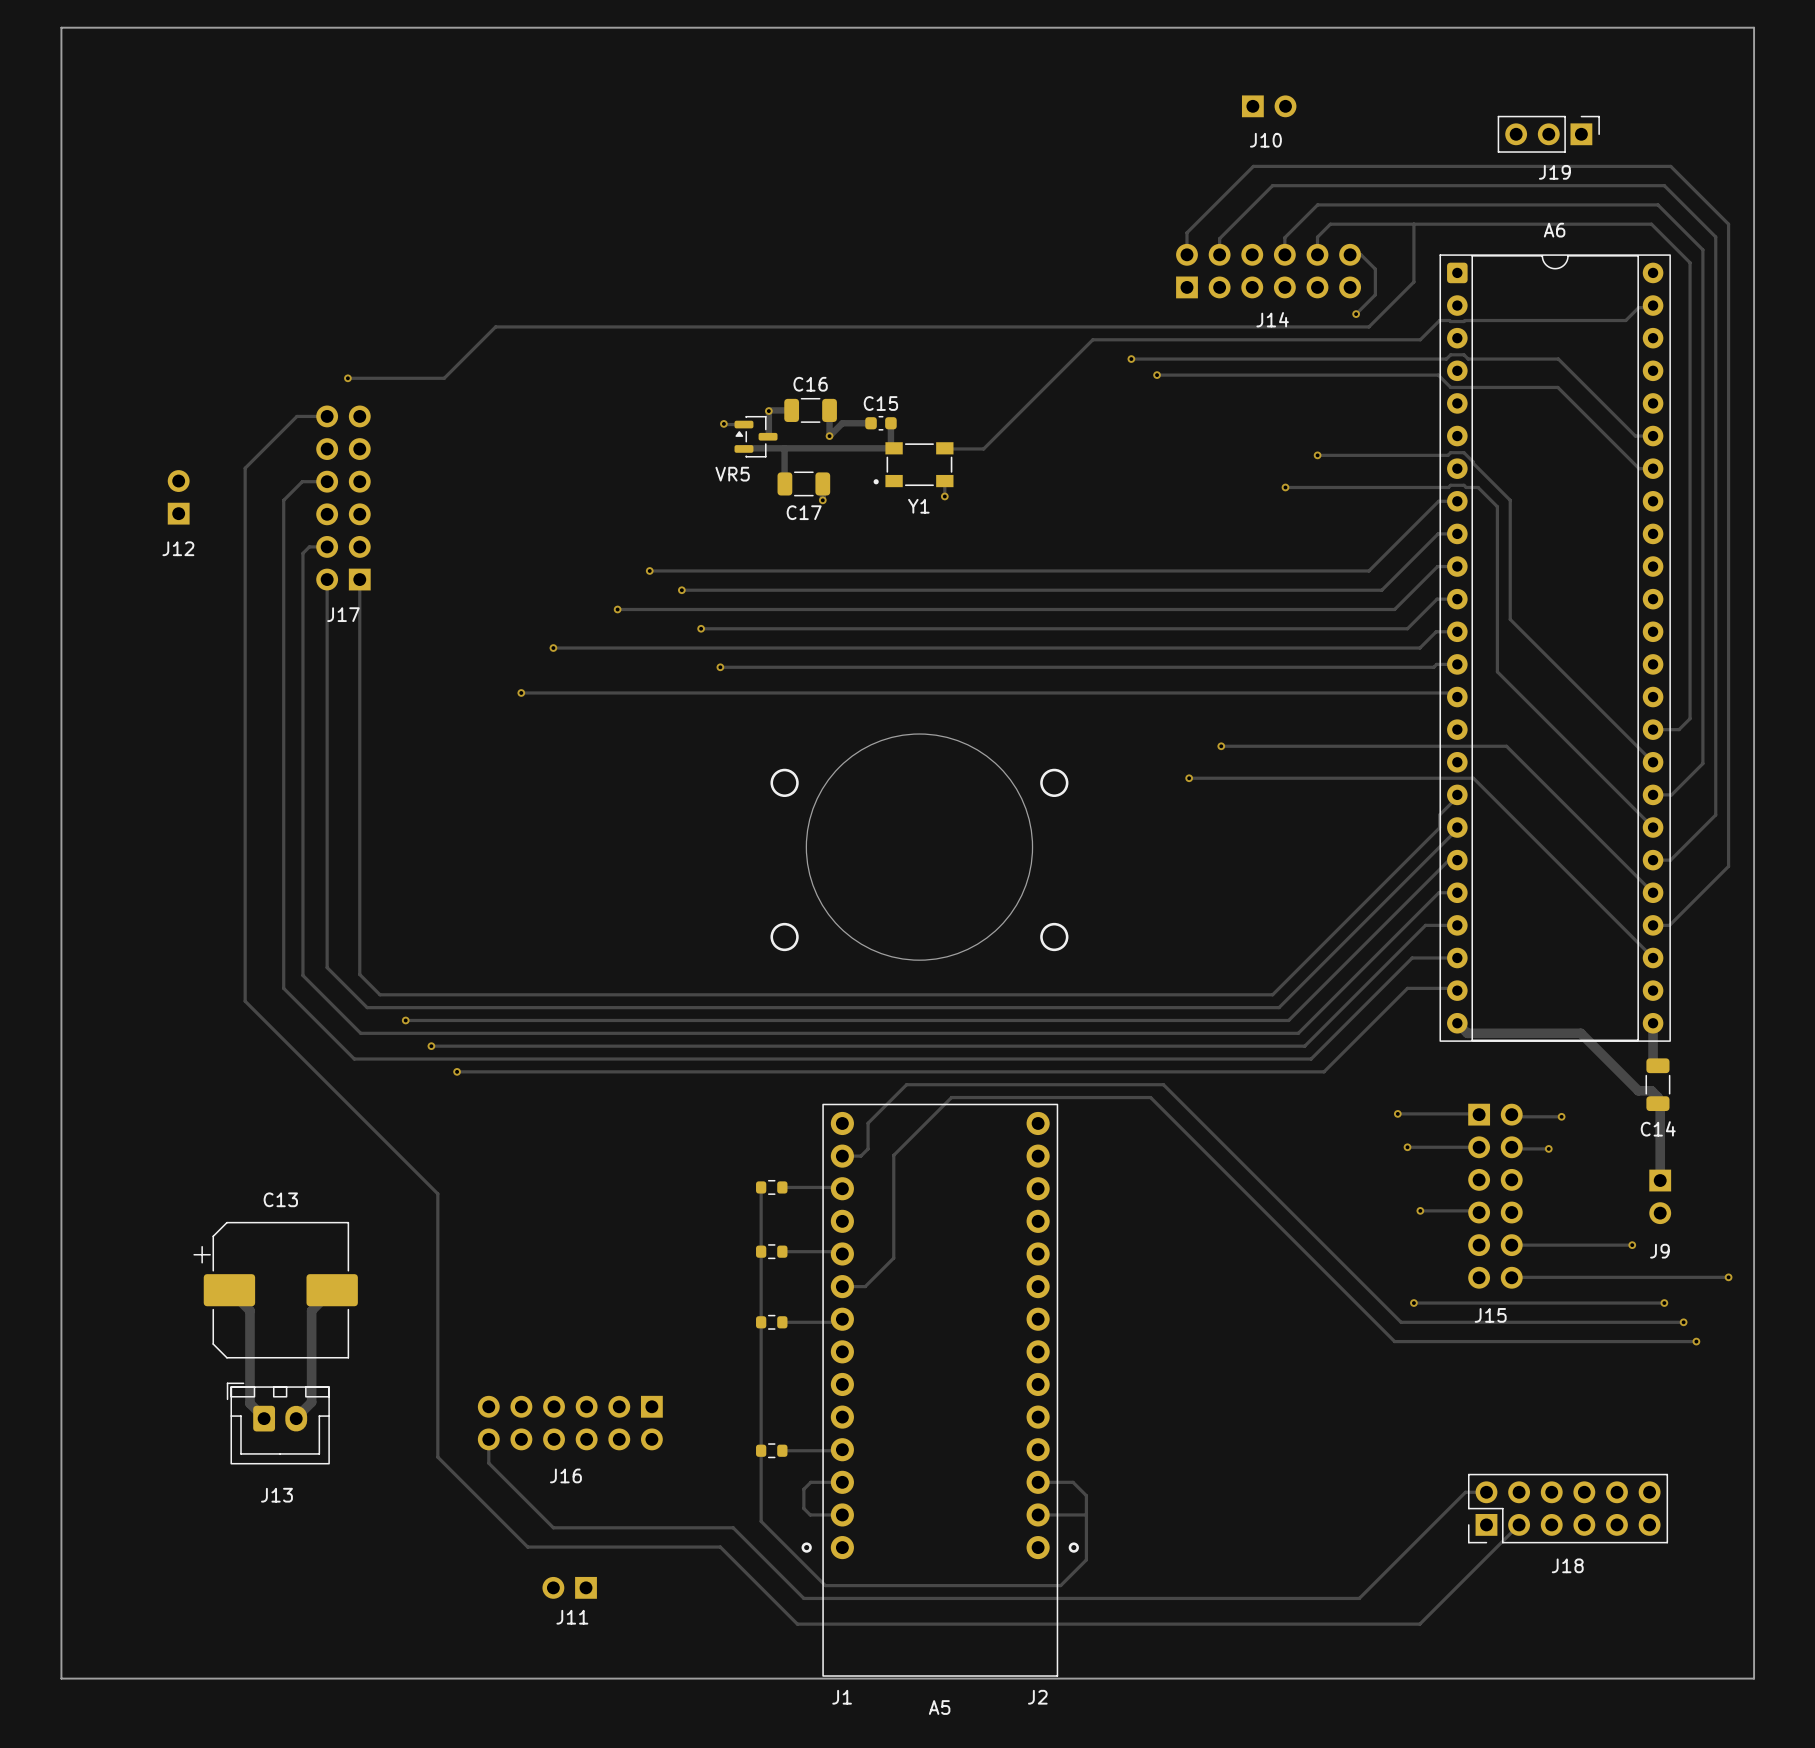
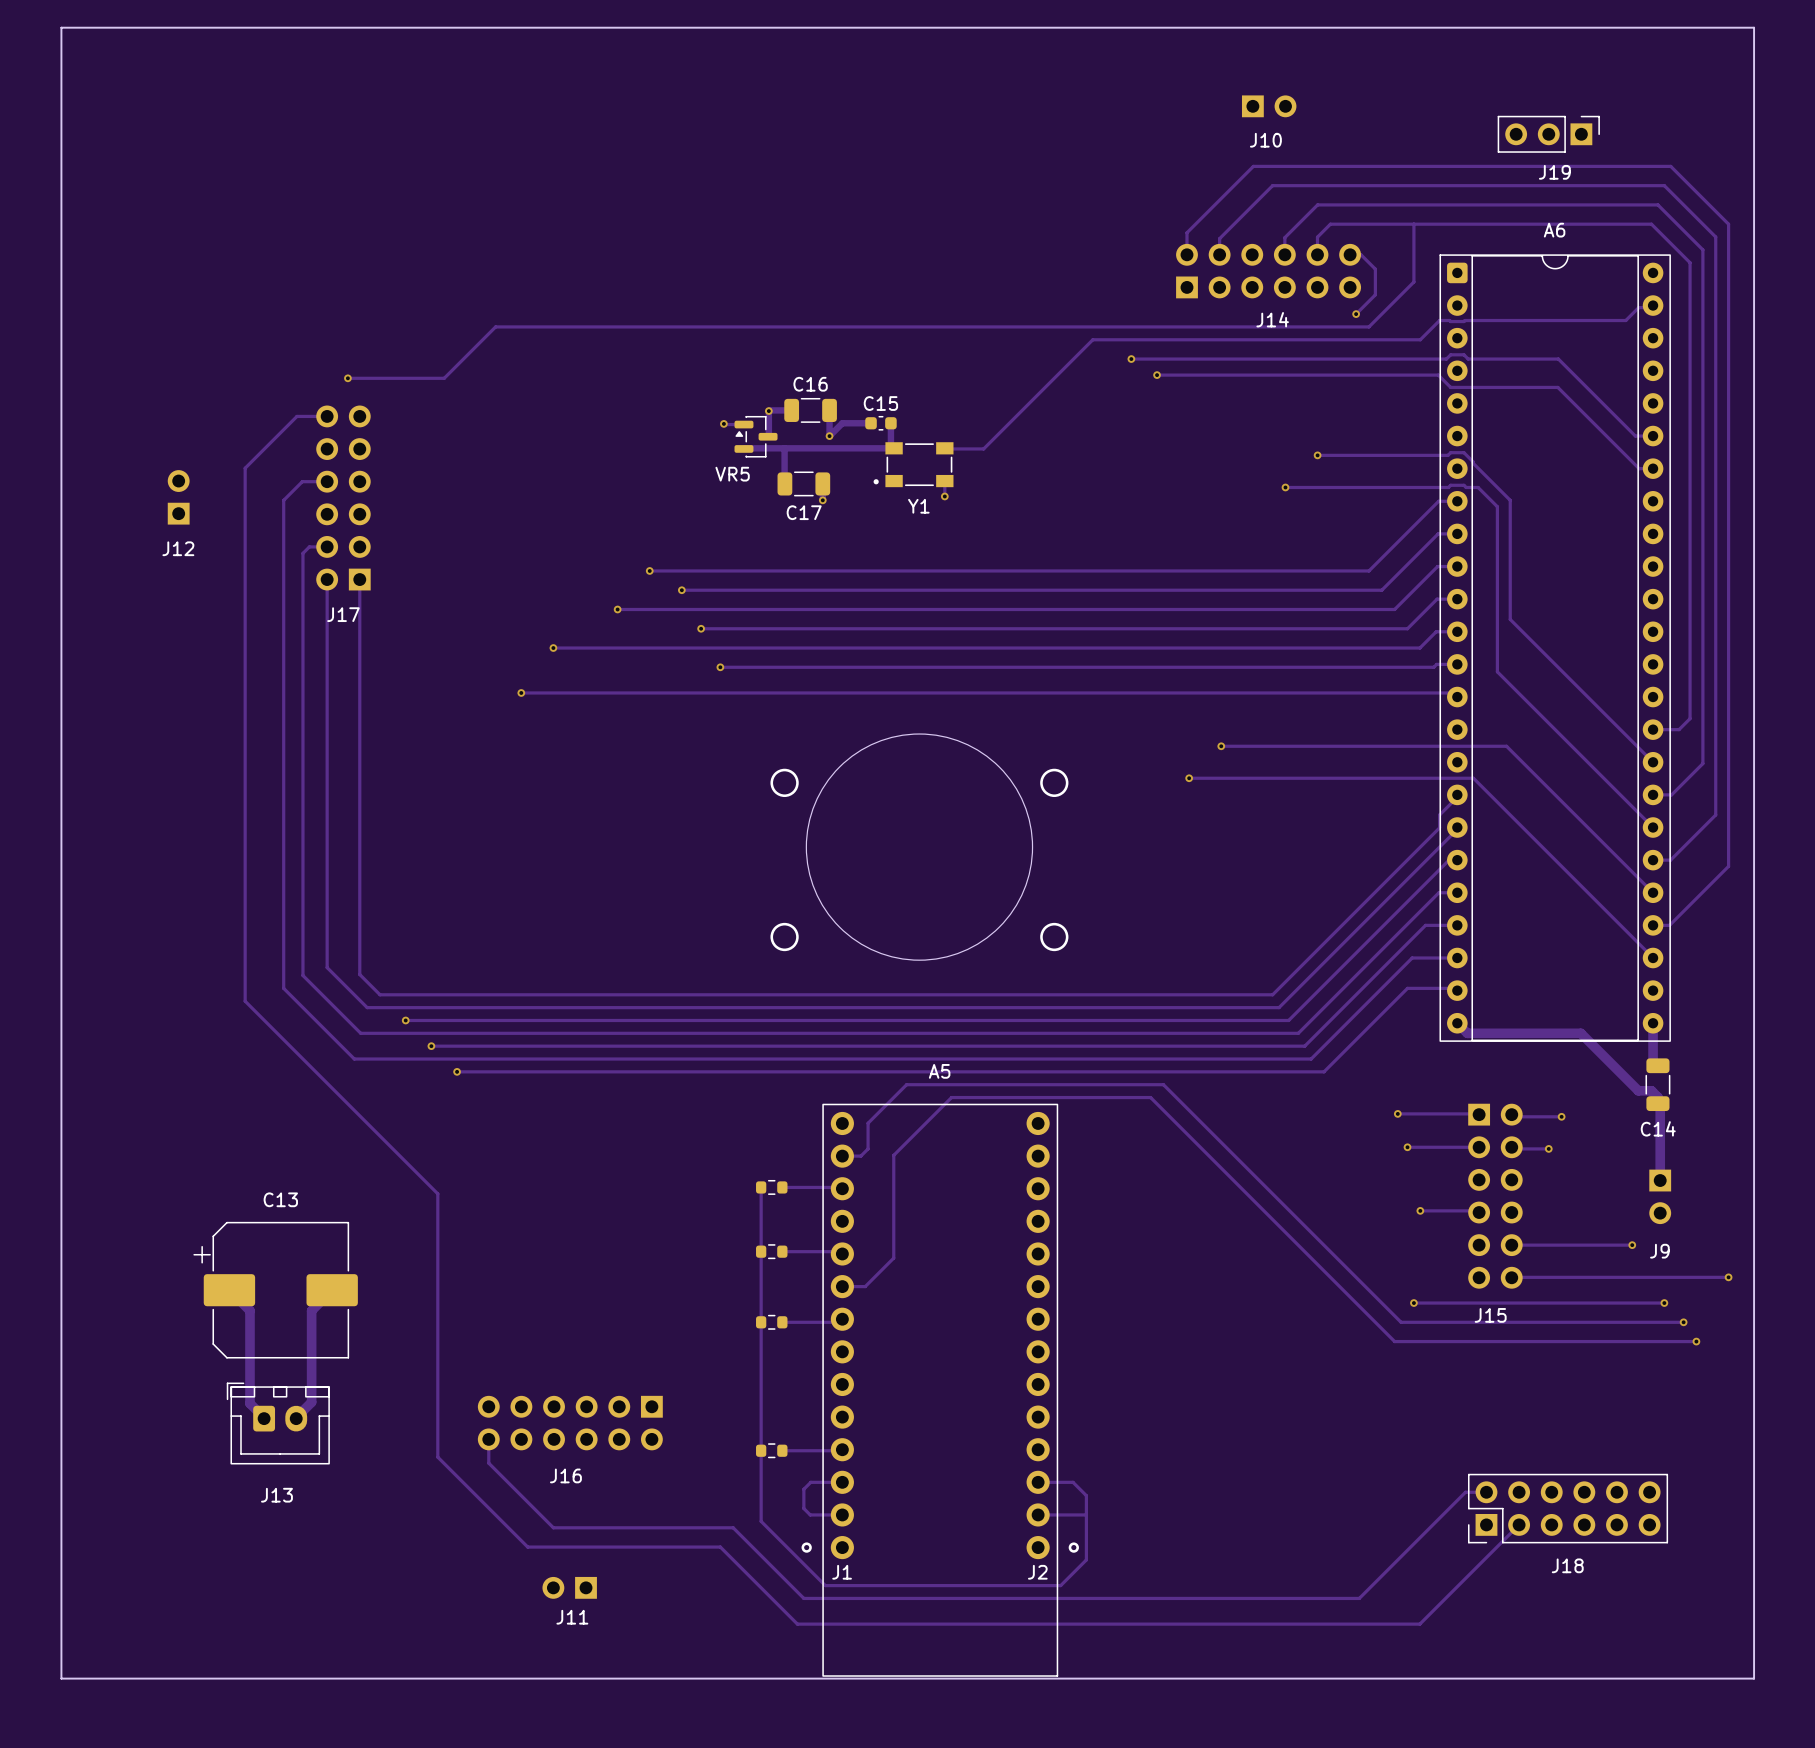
A5 text position: J1 (842, 1697) -> J1 (842, 1572)
A5 text position: J2 (1037, 1697) -> J2 (1037, 1572)
A5 name position: A5 (939, 1707) -> A5 (939, 1071)

